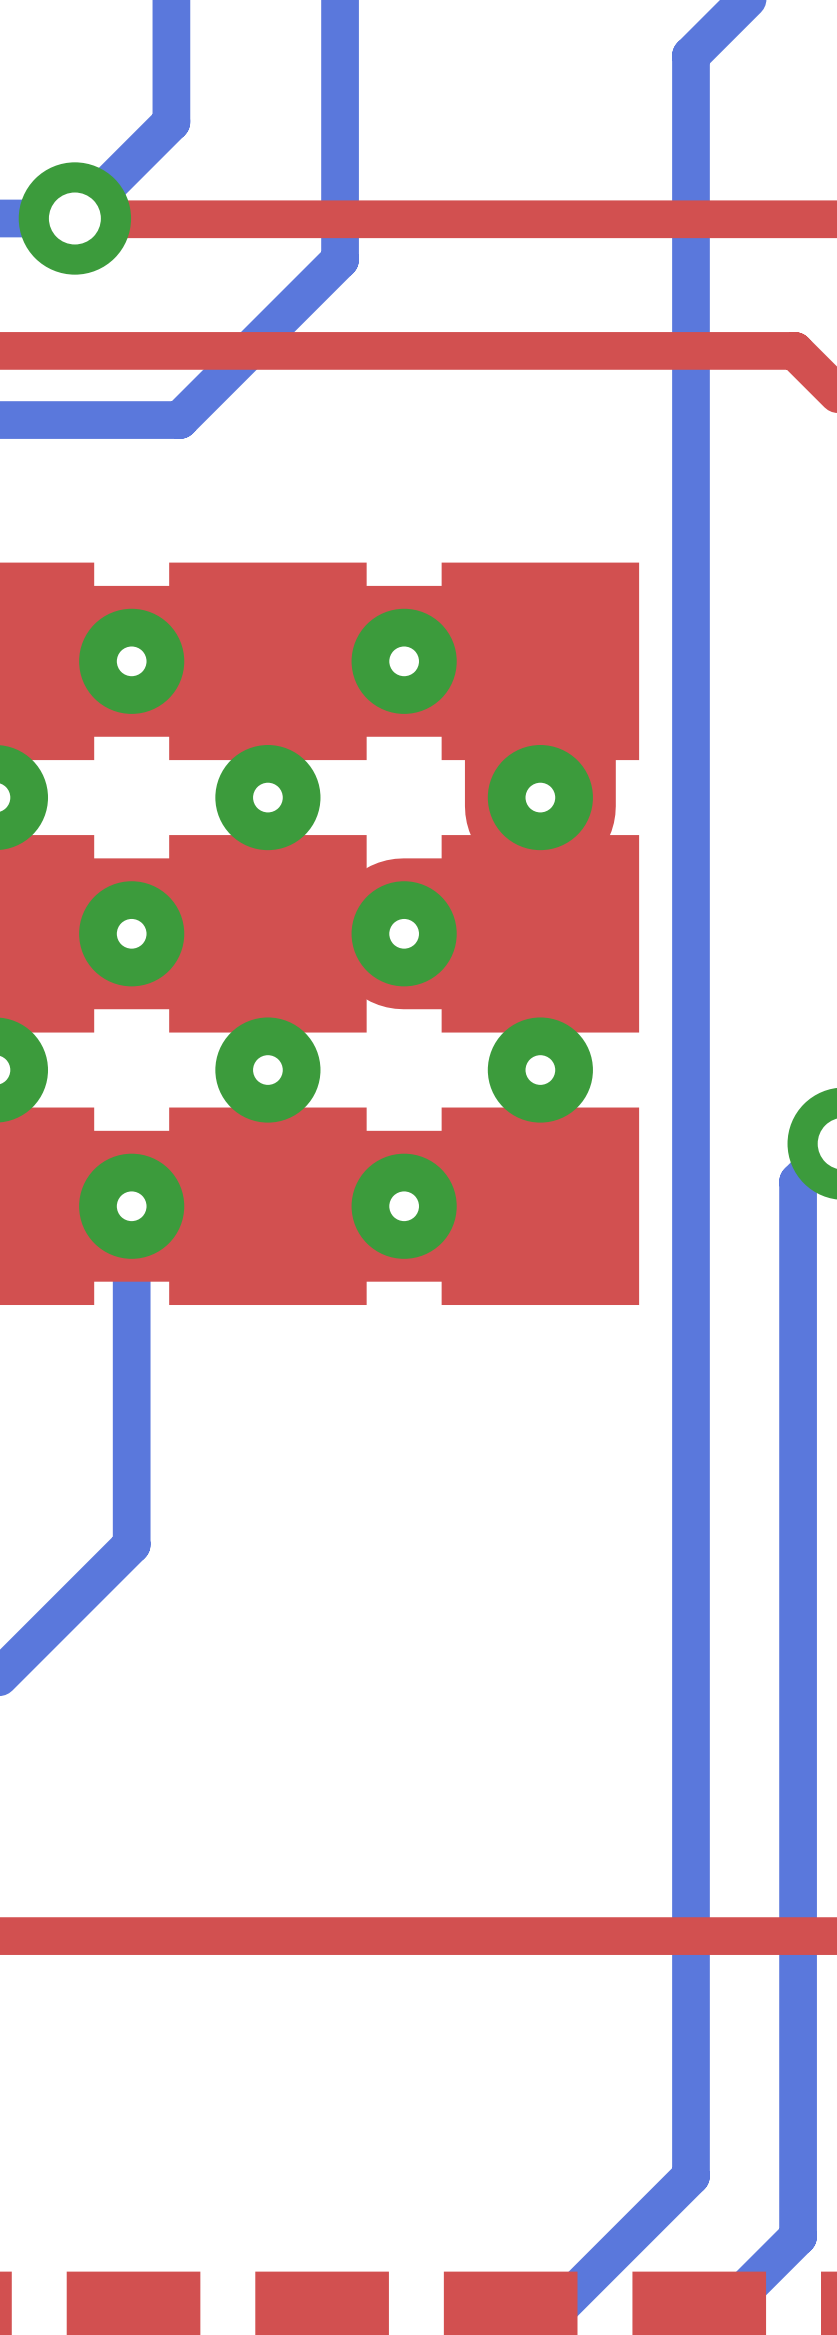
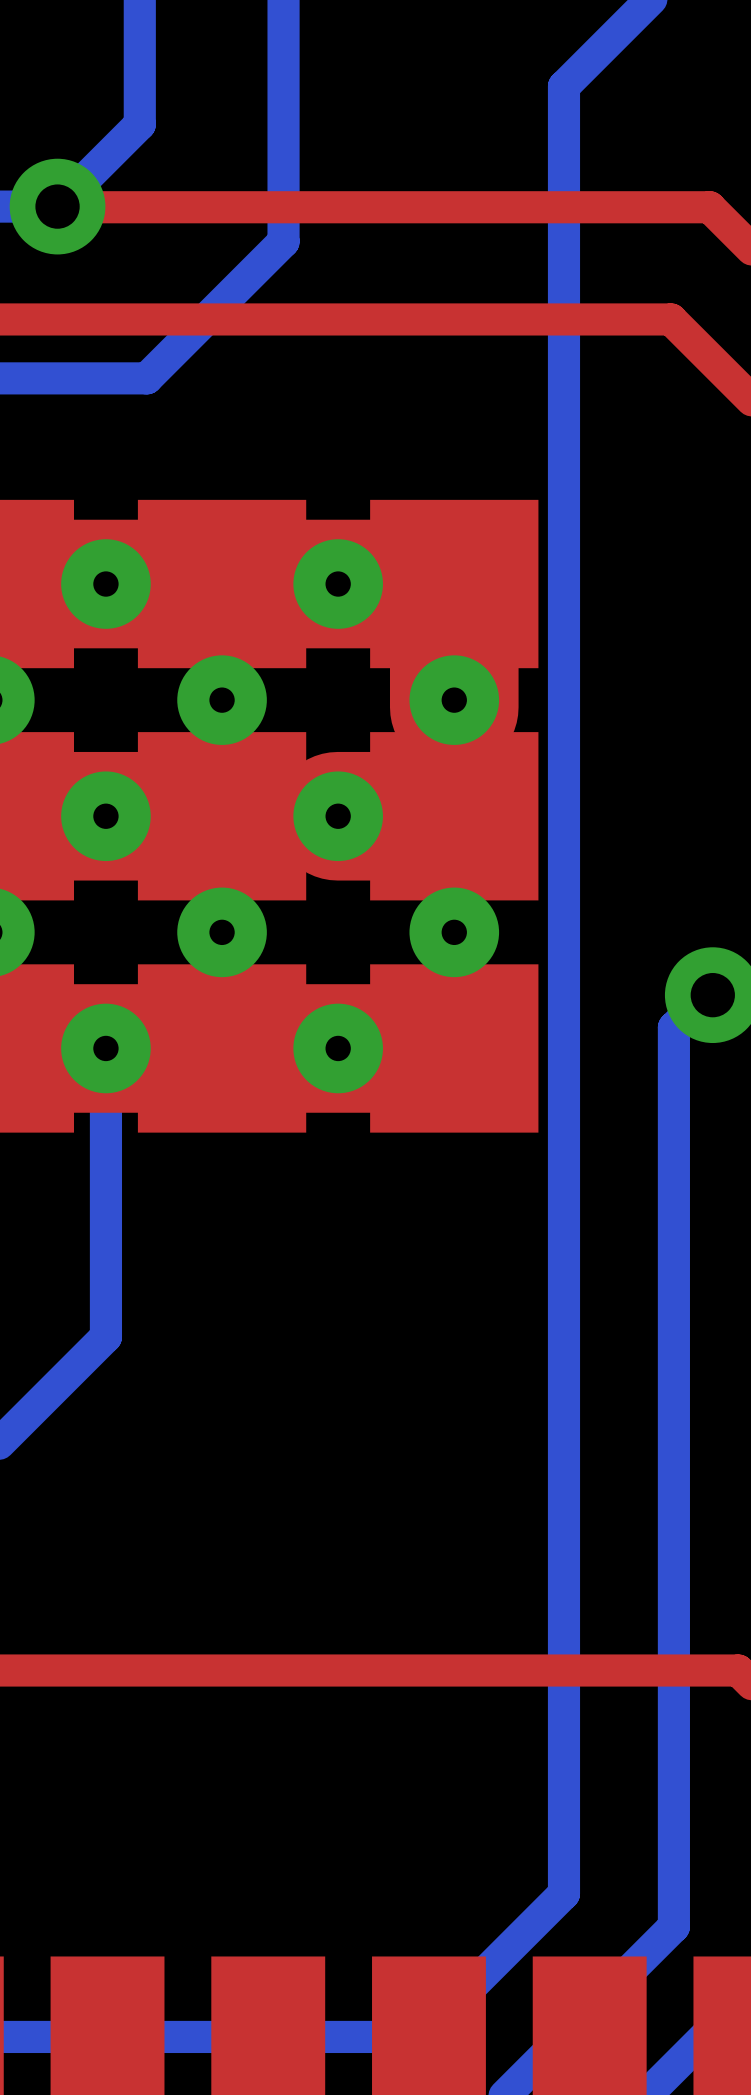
bottom track: (690, 55) (690, 2176) (669, 2197) -> (582, 67) (563, 86) (563, 1893)

